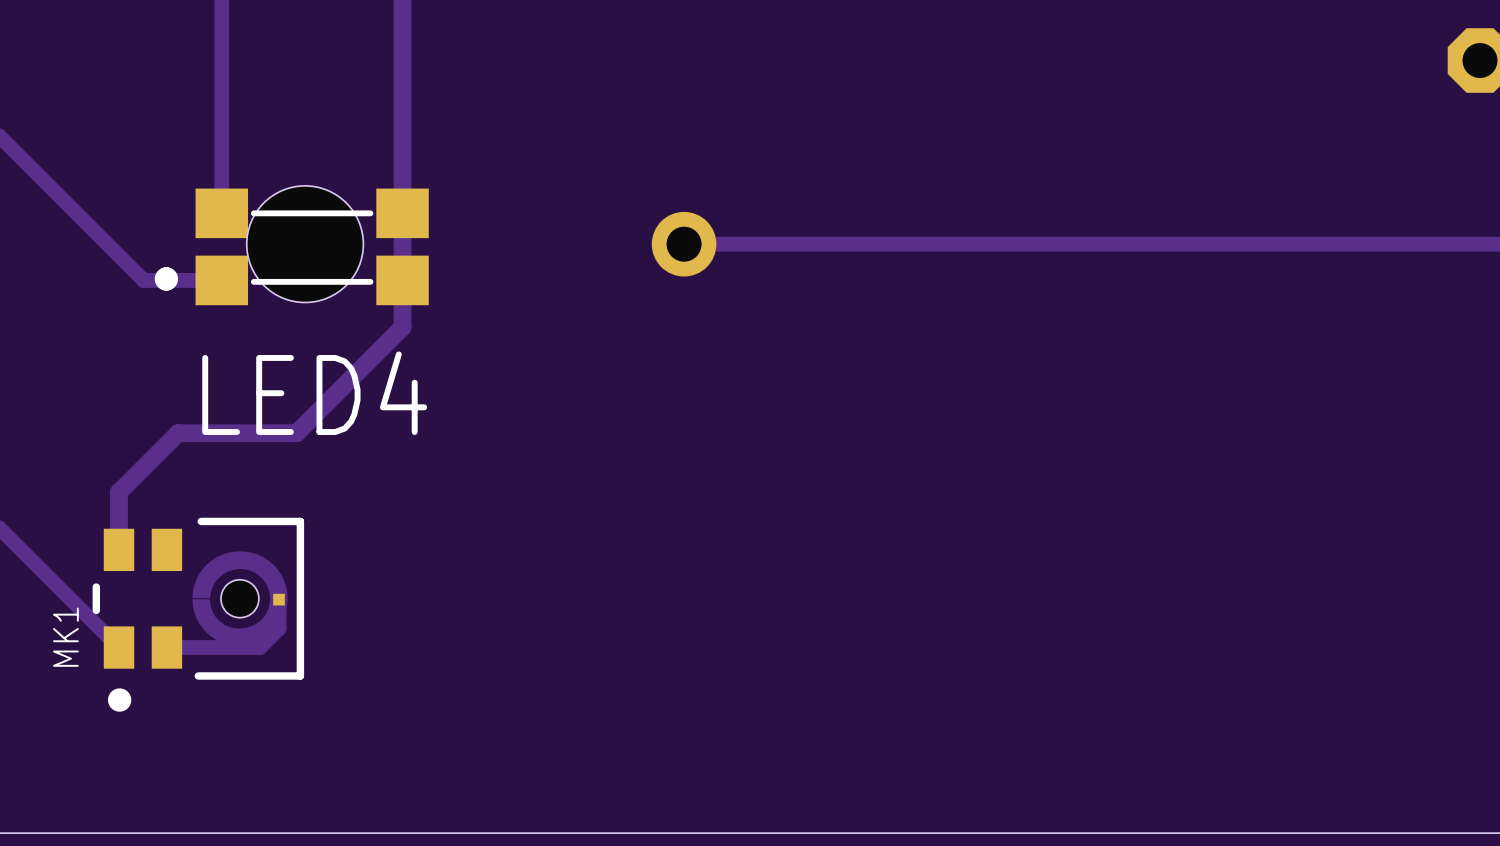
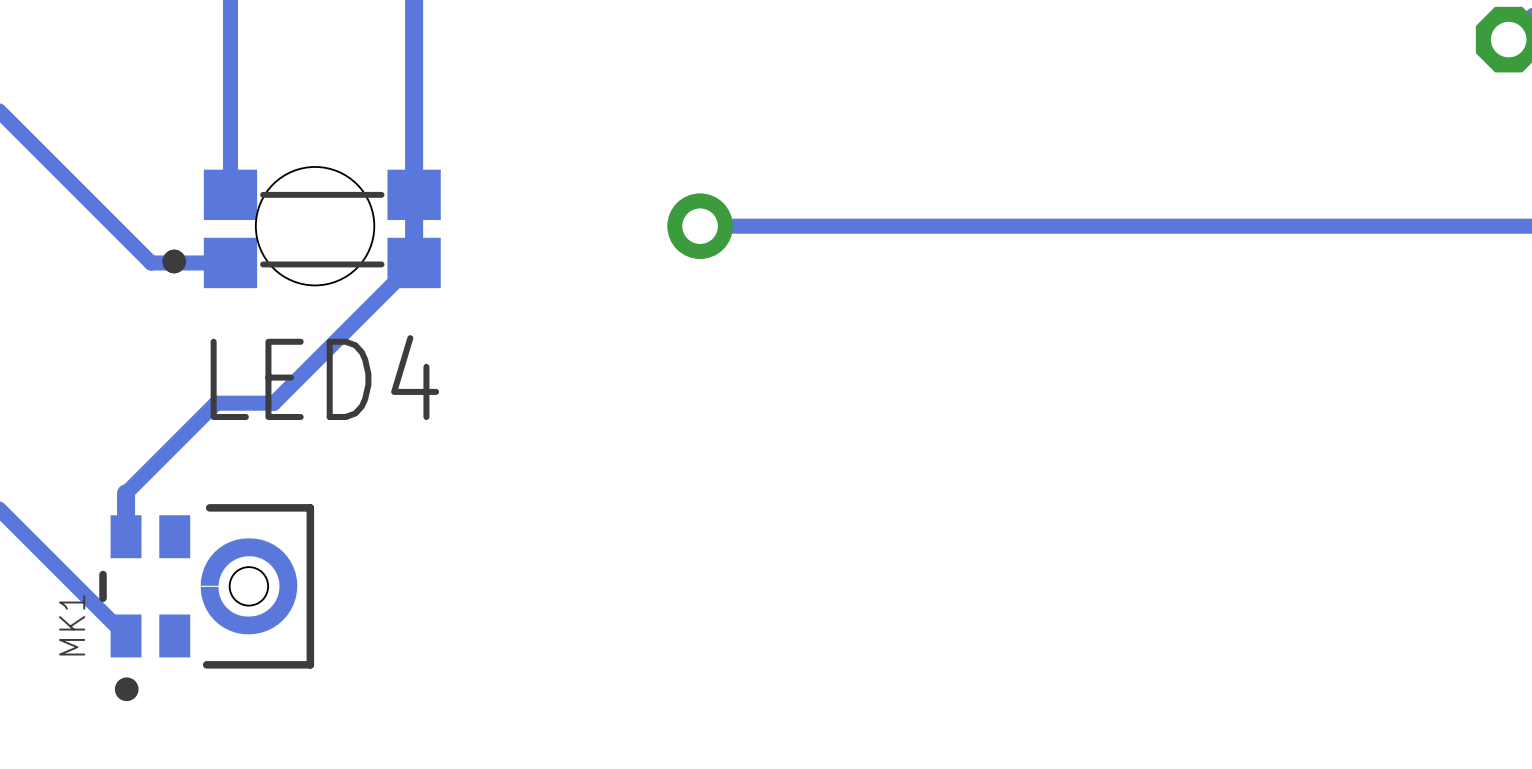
track: (402, 280) (402, 327) (296, 433) (178, 433) (118, 492) (118, 507) -> (414, 262) (273, 403) (216, 403) (126, 493)
track: (278, 599) (278, 628) (259, 647) (166, 647) -> none

